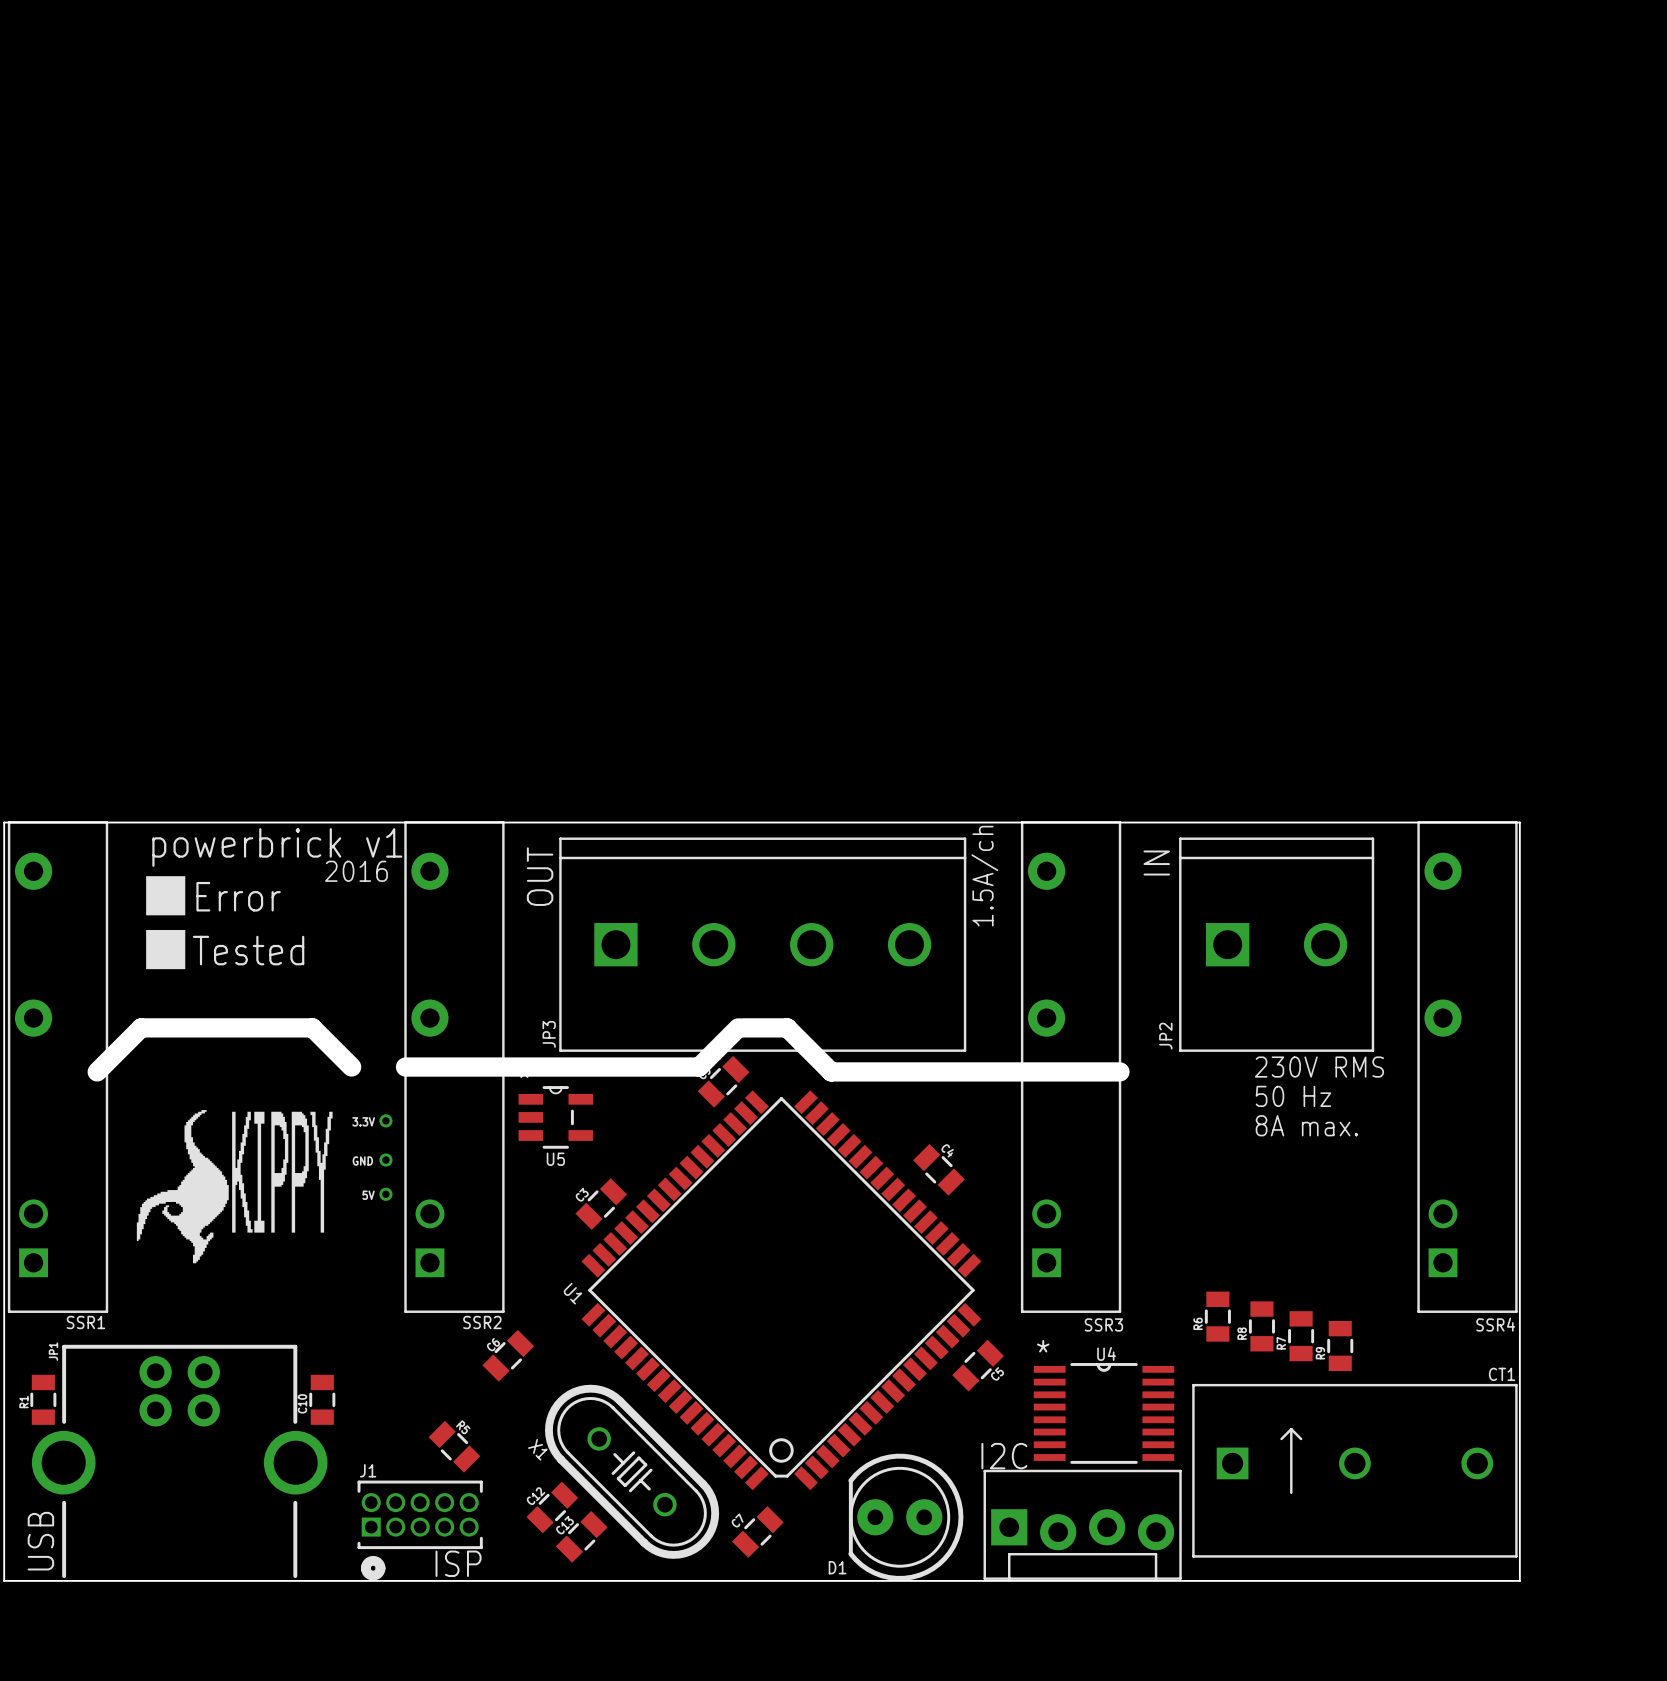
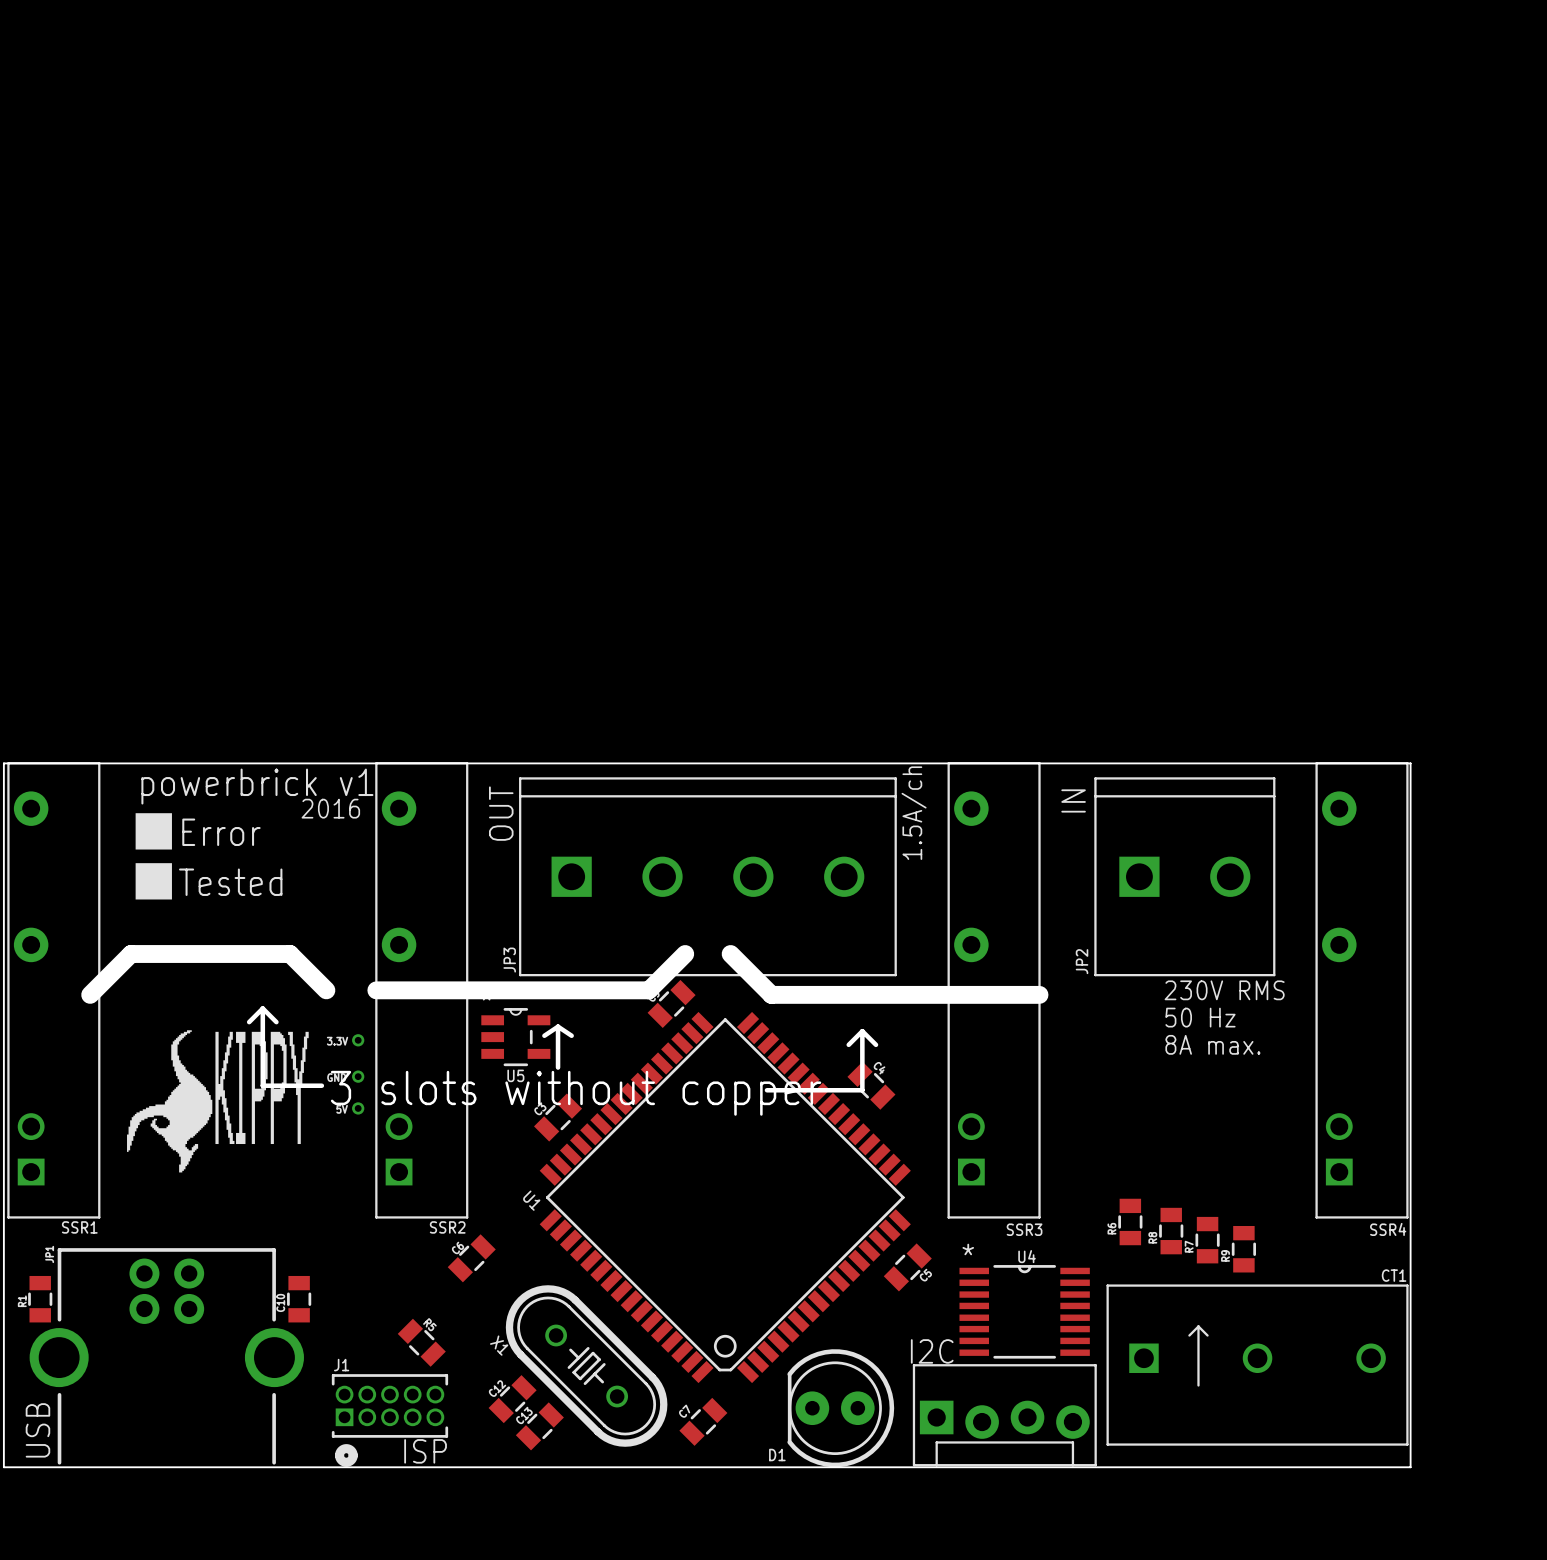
board edge: (743, 1027) (787, 1027) -> none
board edge: none -> (262, 1008) (262, 1085) (321, 1085)
board edge: none -> (262, 1008) (249, 1022)
board edge: none -> (262, 1008) (276, 1022)
board edge: none -> (558, 1026) (558, 1067)
board edge: none -> (558, 1026) (544, 1035)
board edge: none -> (558, 1026) (571, 1035)
board edge: none -> (862, 1031) (862, 1090) (766, 1090)
board edge: none -> (862, 1031) (848, 1044)
board edge: none -> (862, 1031) (875, 1044)
text: none -> 3 slots without copper (576, 1093)

